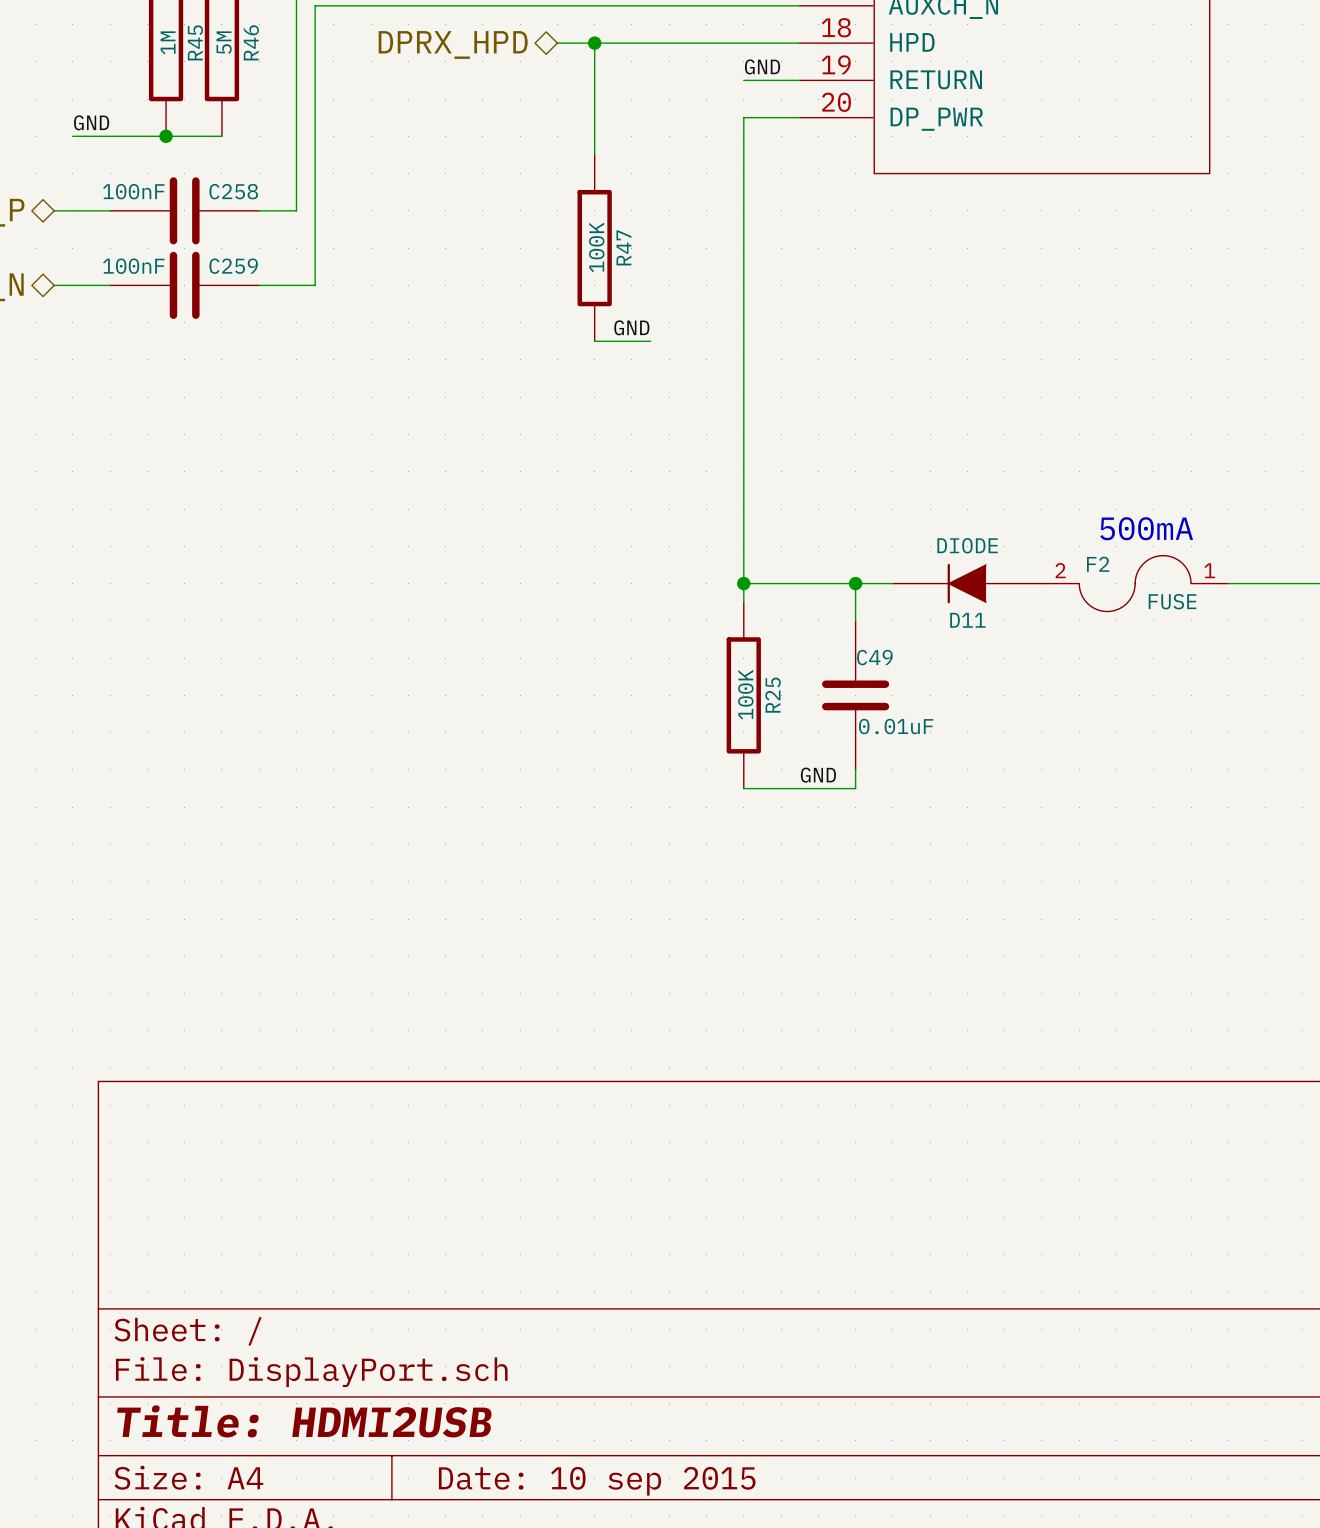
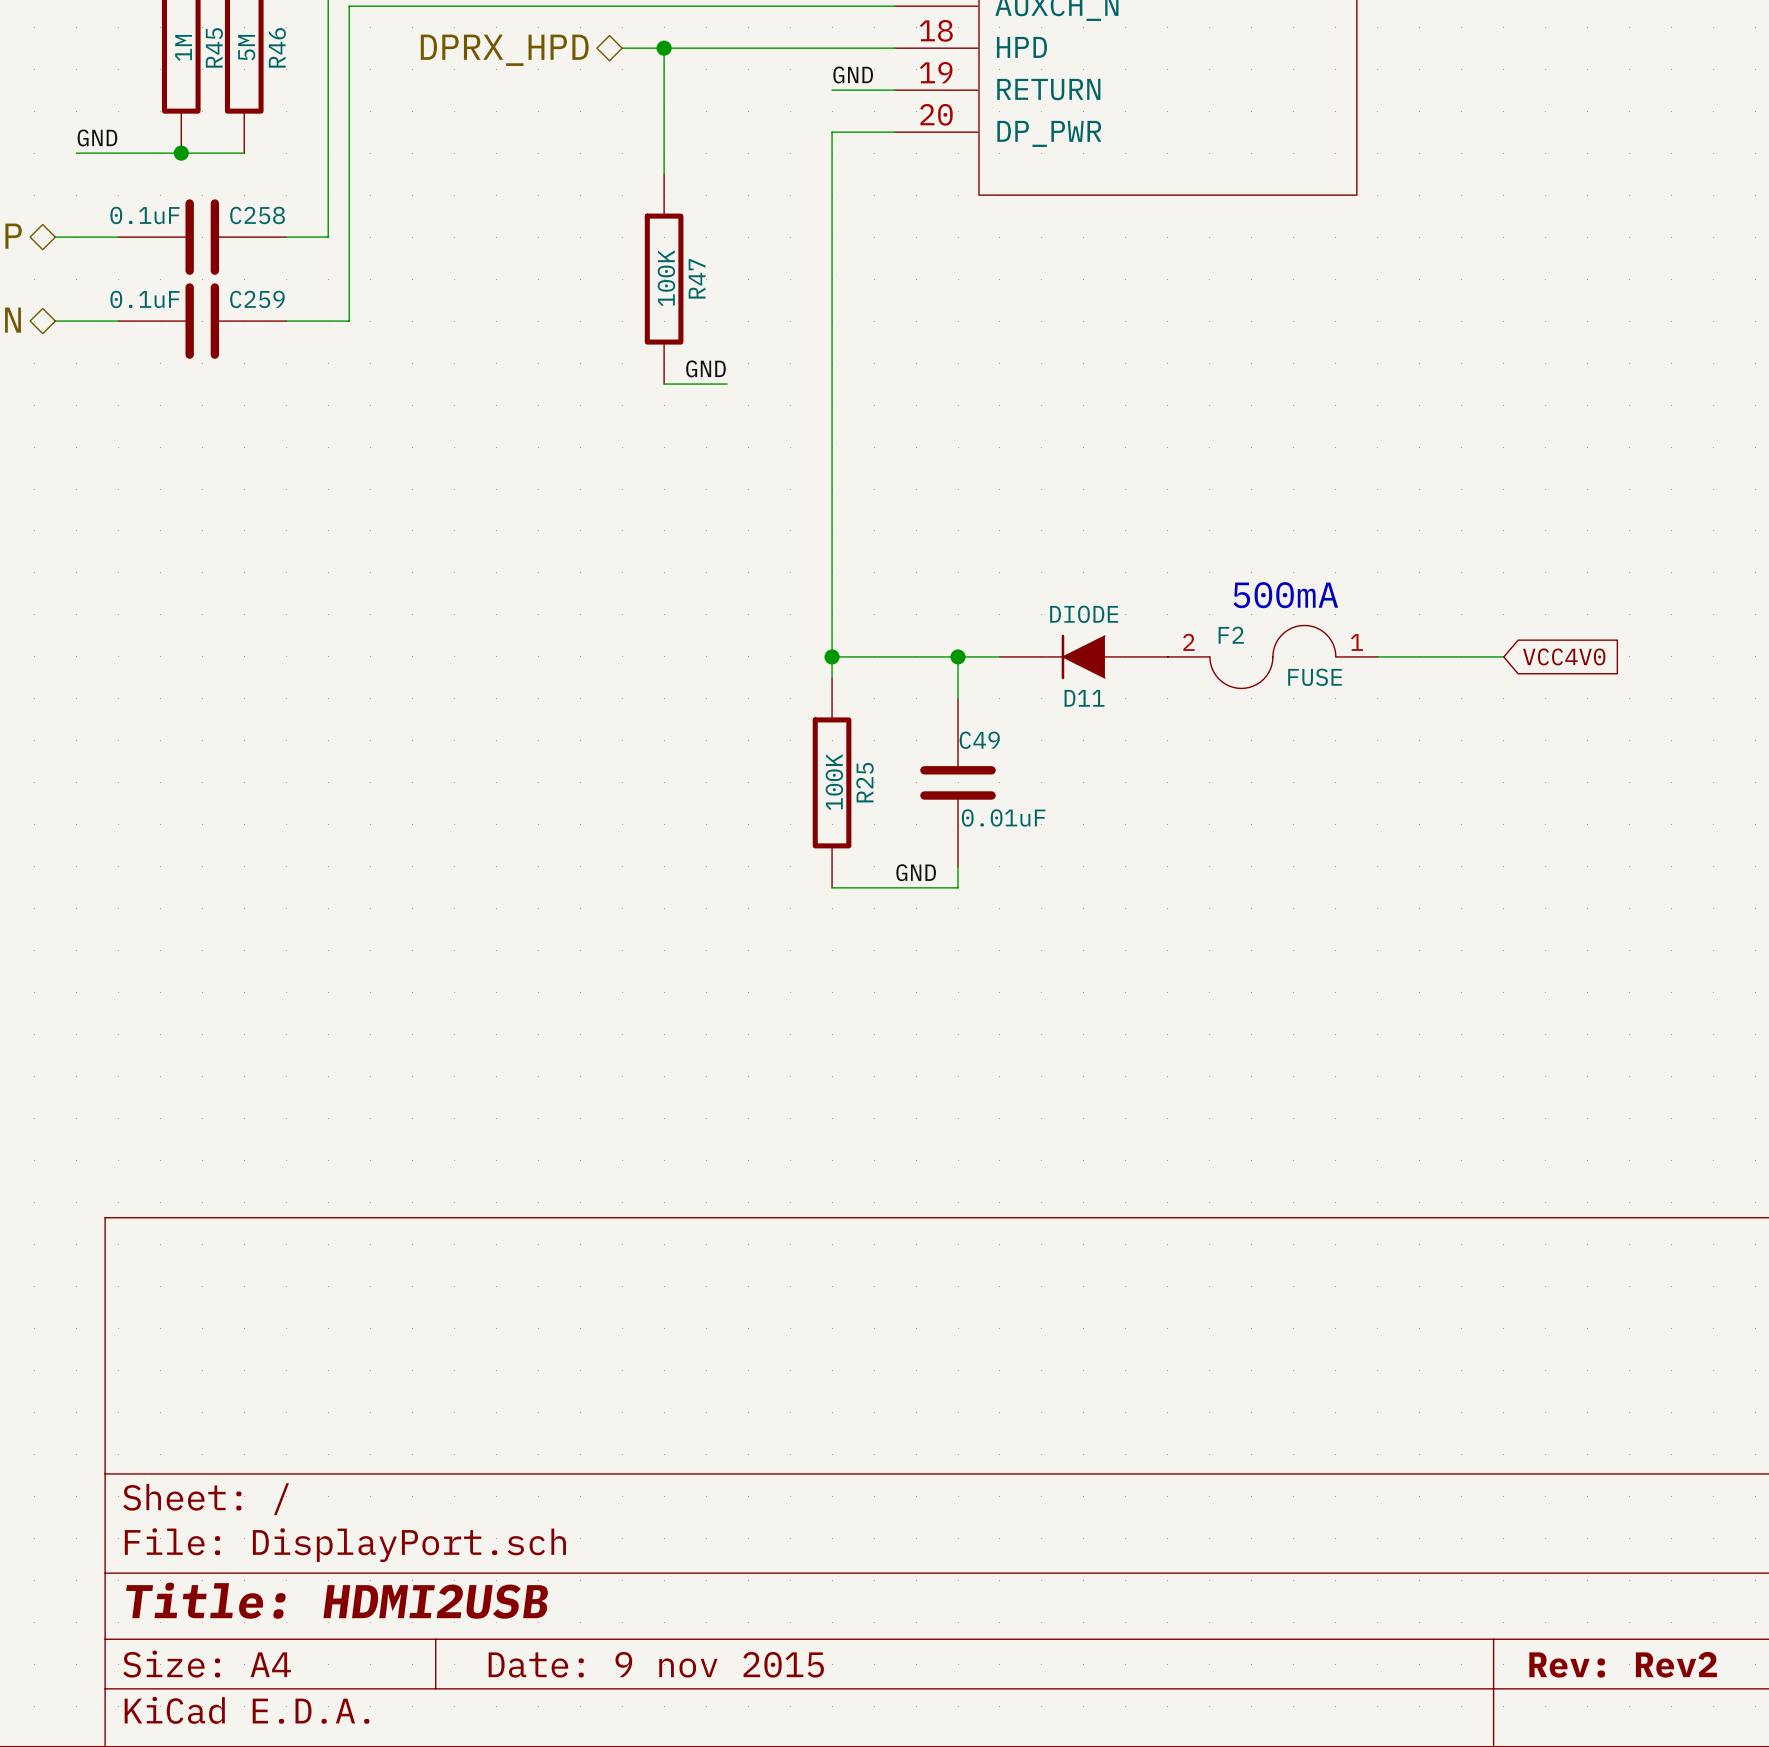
C258 value: 100nF (133, 191) -> 0.1uF (145, 215)
C259 value: 100nF (133, 266) -> 0.1uF (145, 299)
title block: Date: 10 sep 2015 (597, 1481) -> Date: 9 nov 2015 (656, 1664)

